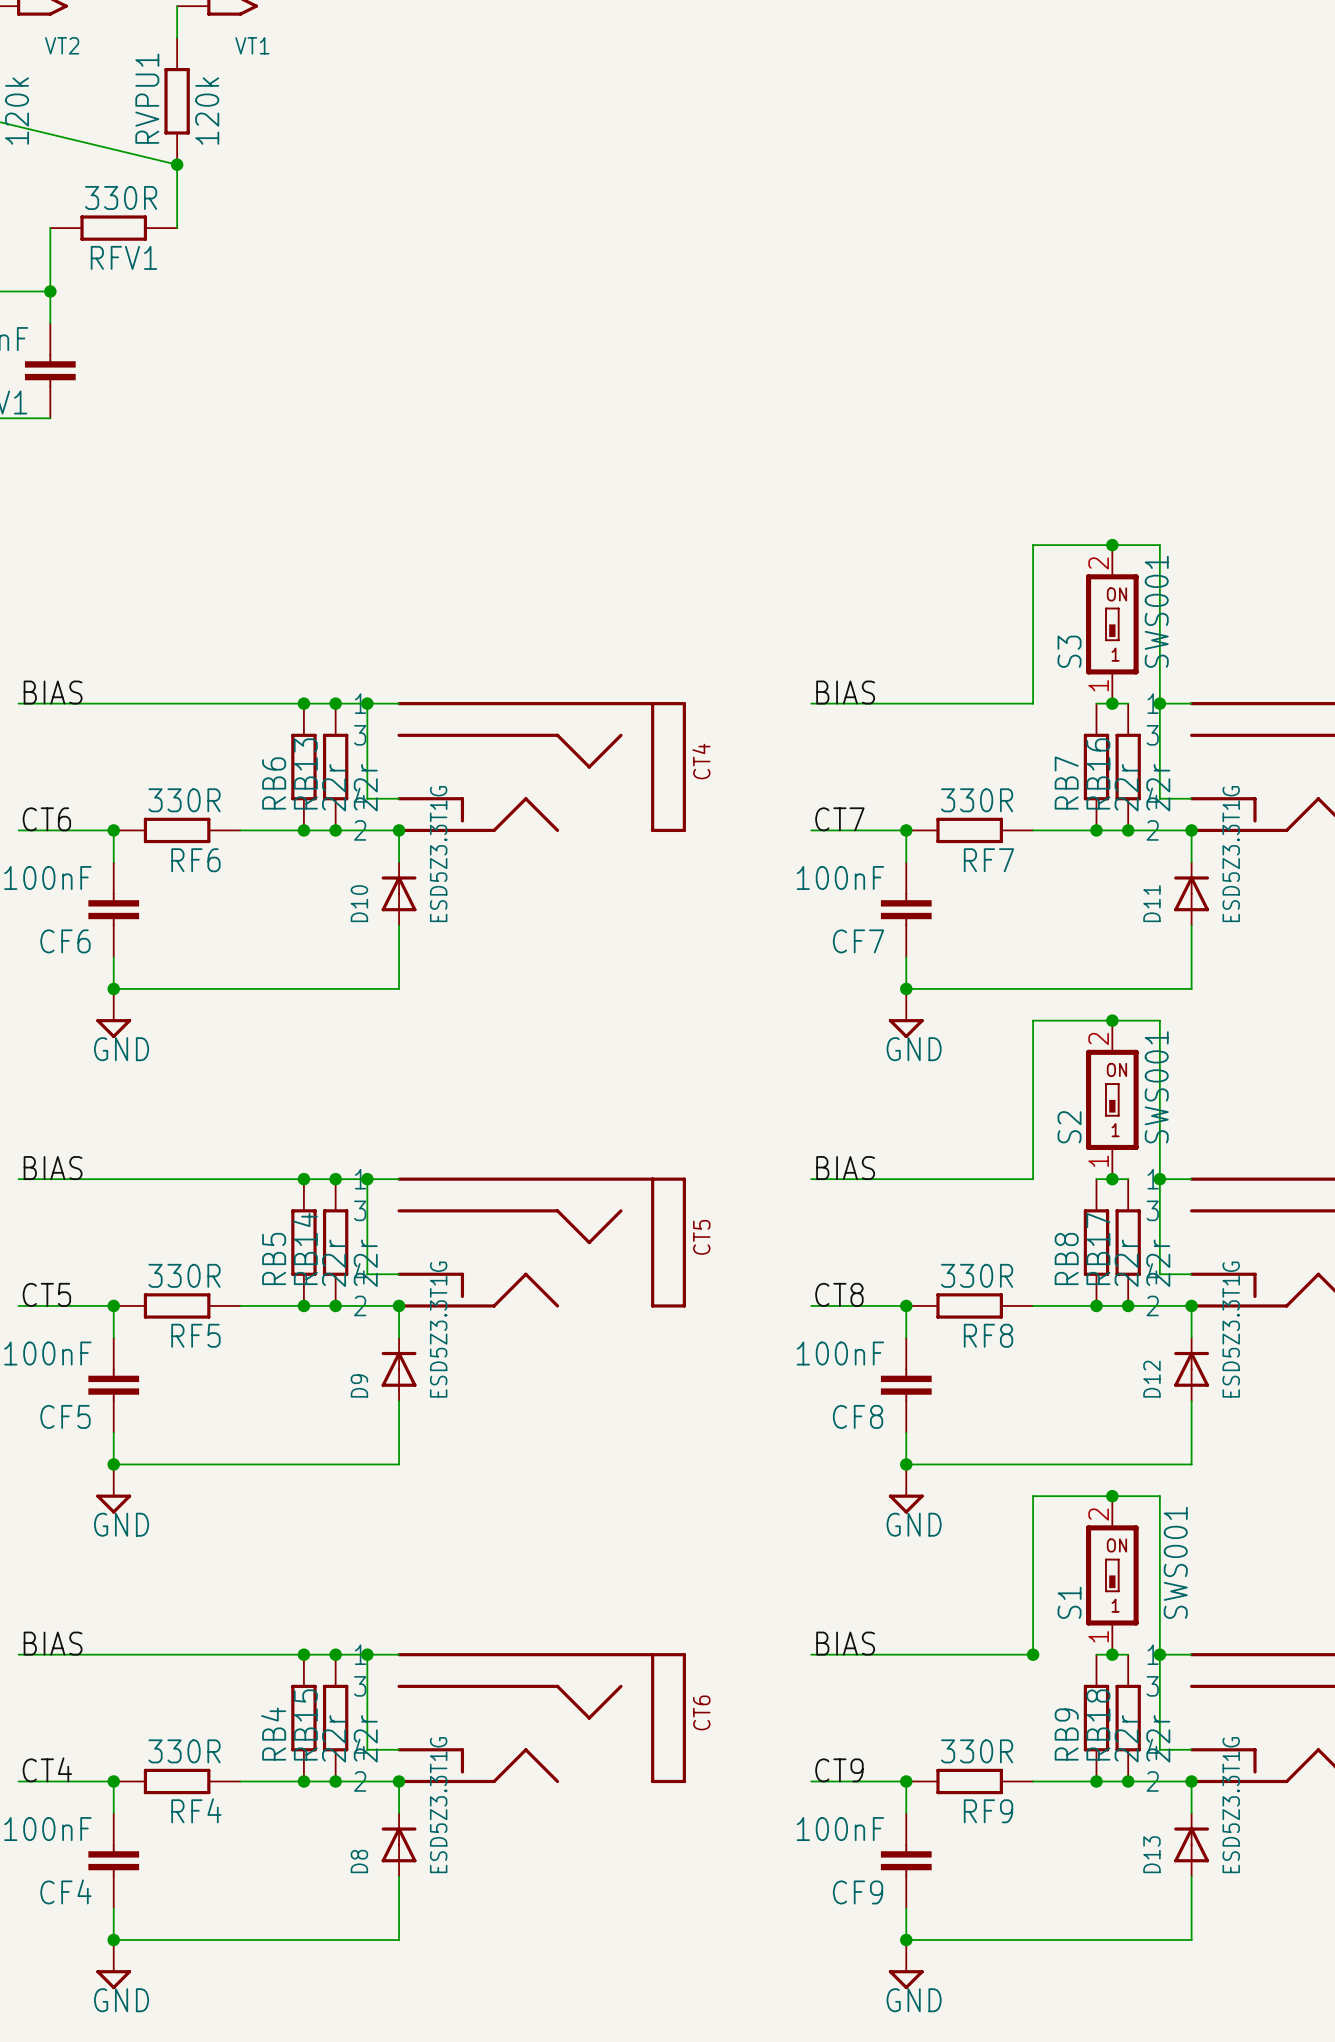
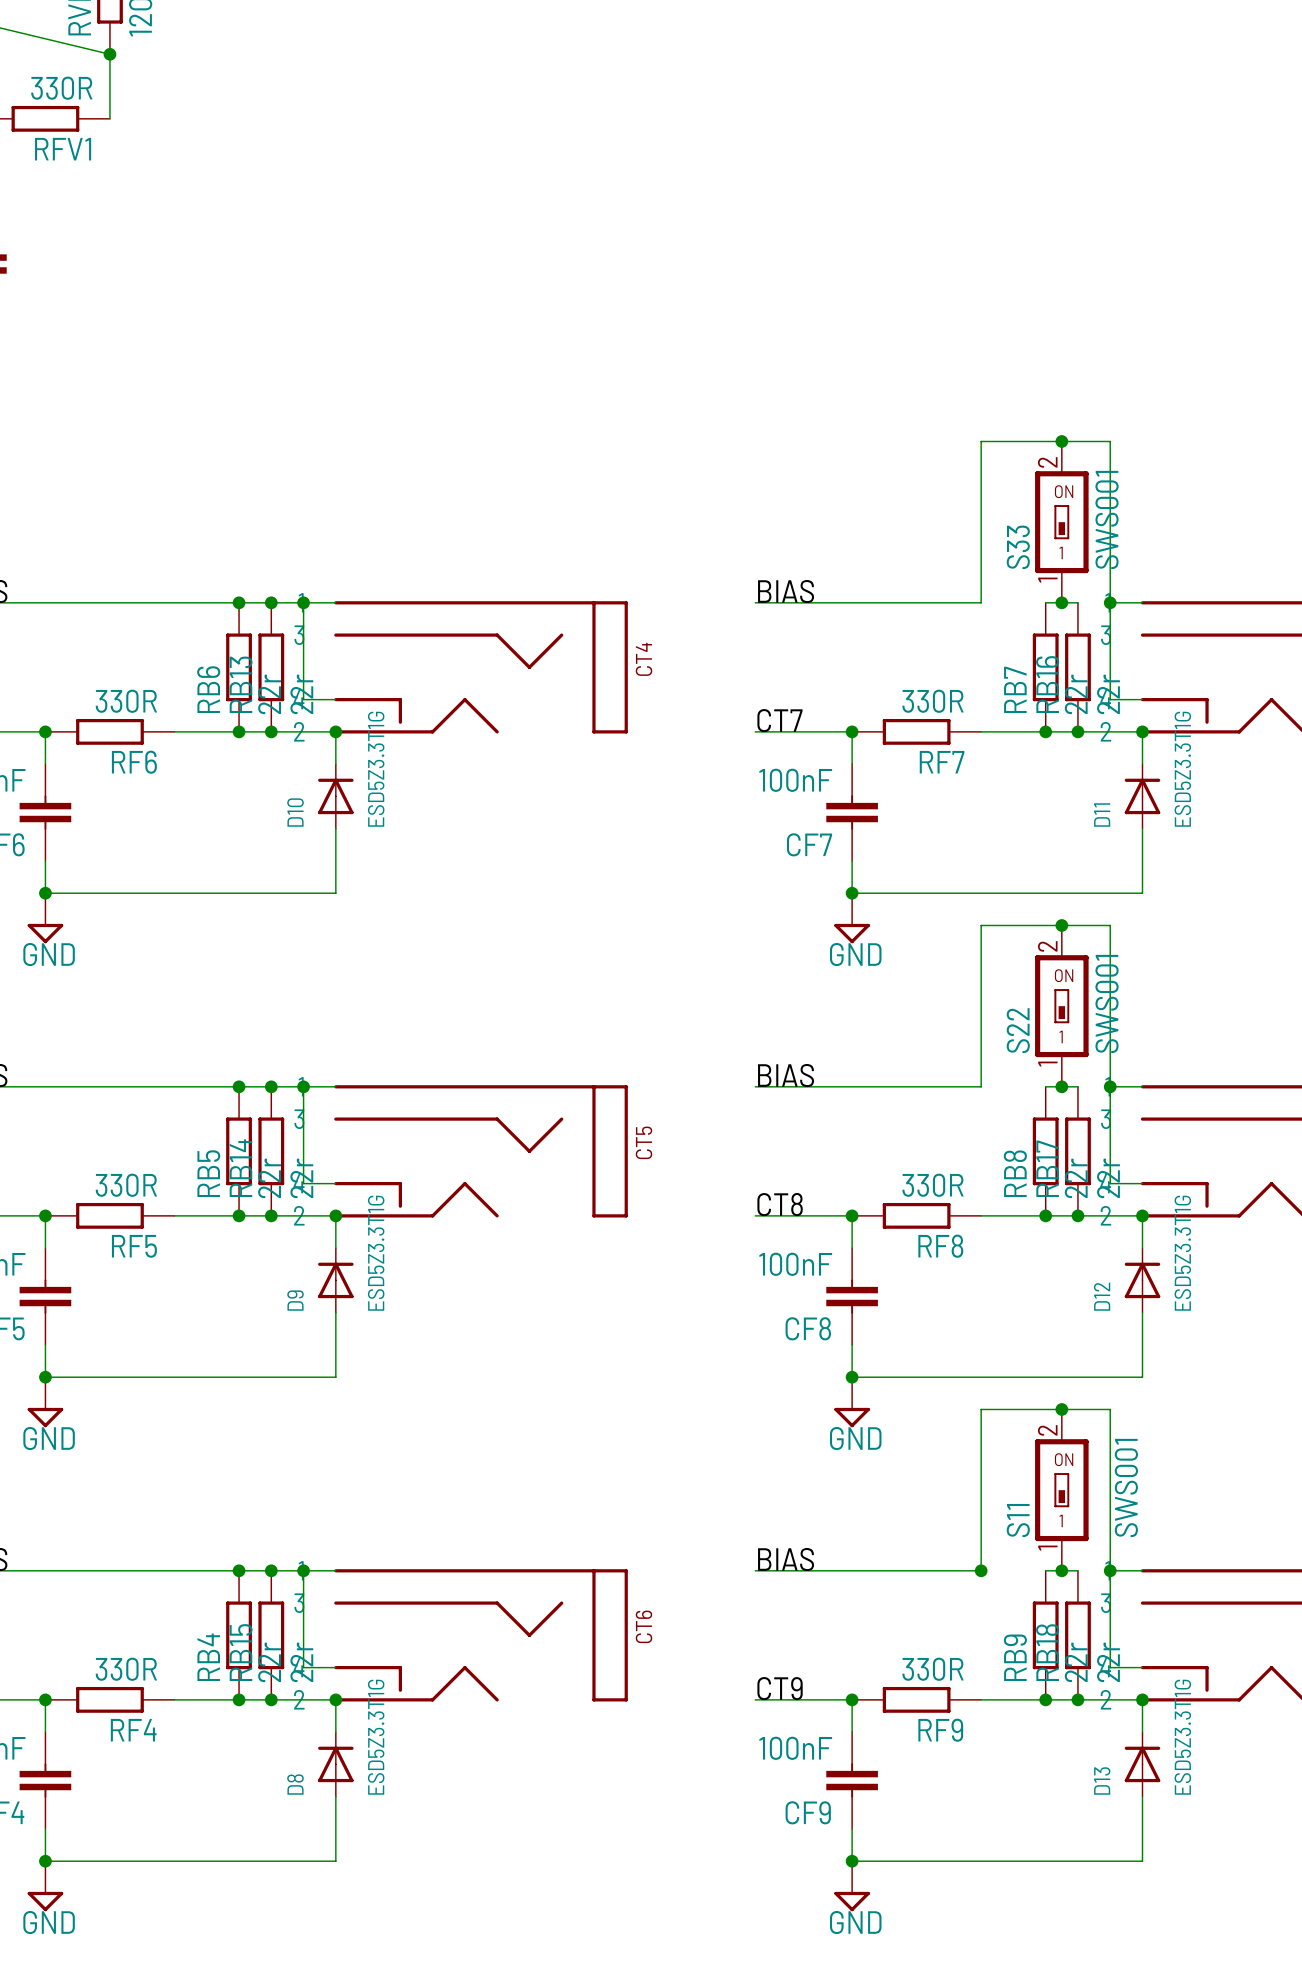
S3 name: S3 (1069, 651) -> S33 (1018, 547)
S2 name: S2 (1069, 1127) -> S22 (1018, 1030)
S1 name: S1 (1069, 1602) -> S11 (1018, 1520)

